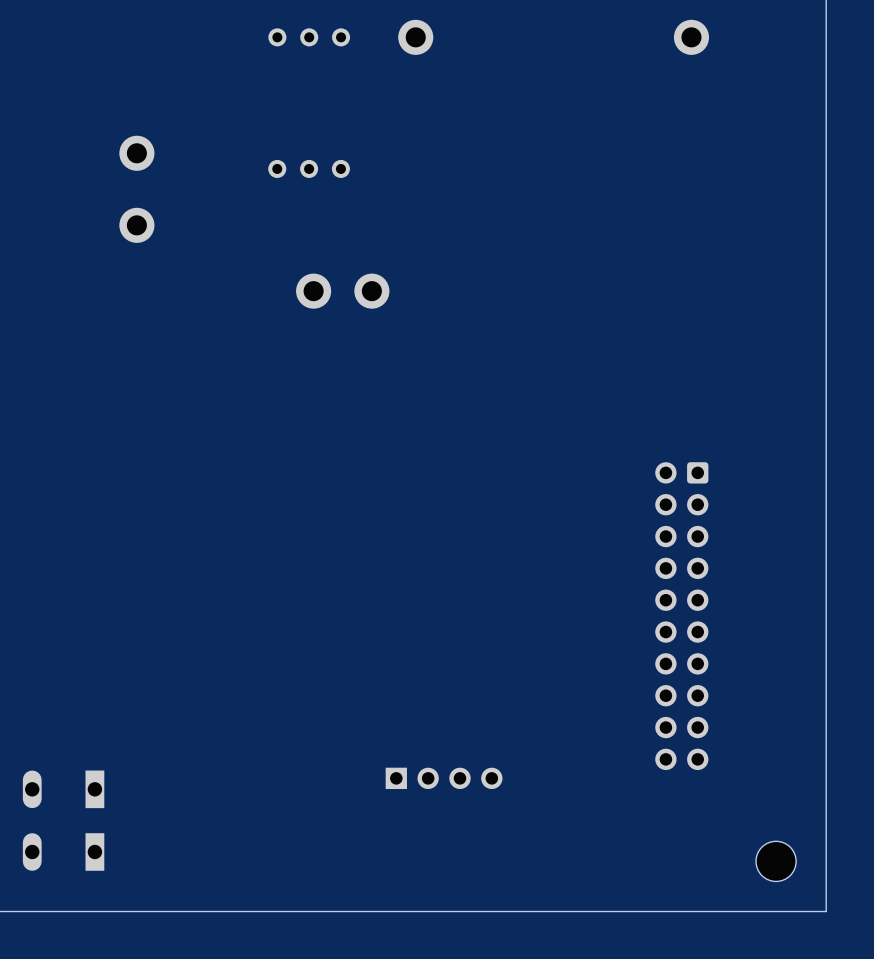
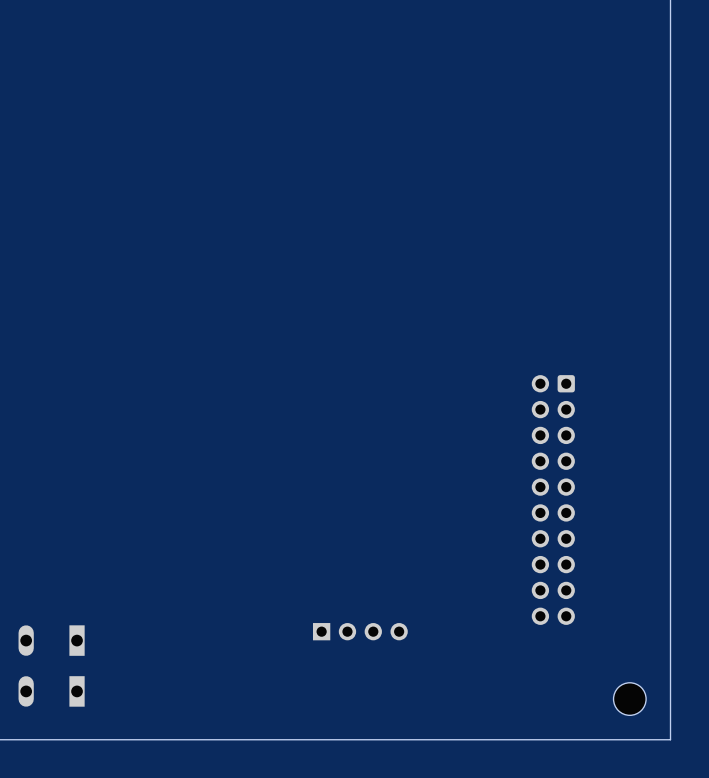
part: (309, 37) -> none
part: (415, 37) -> none
part: (691, 37) -> none
part: (136, 153) -> none
part: (309, 168) -> none
part: (136, 225) -> none
part: (313, 291) -> none
part: (371, 291) -> none

